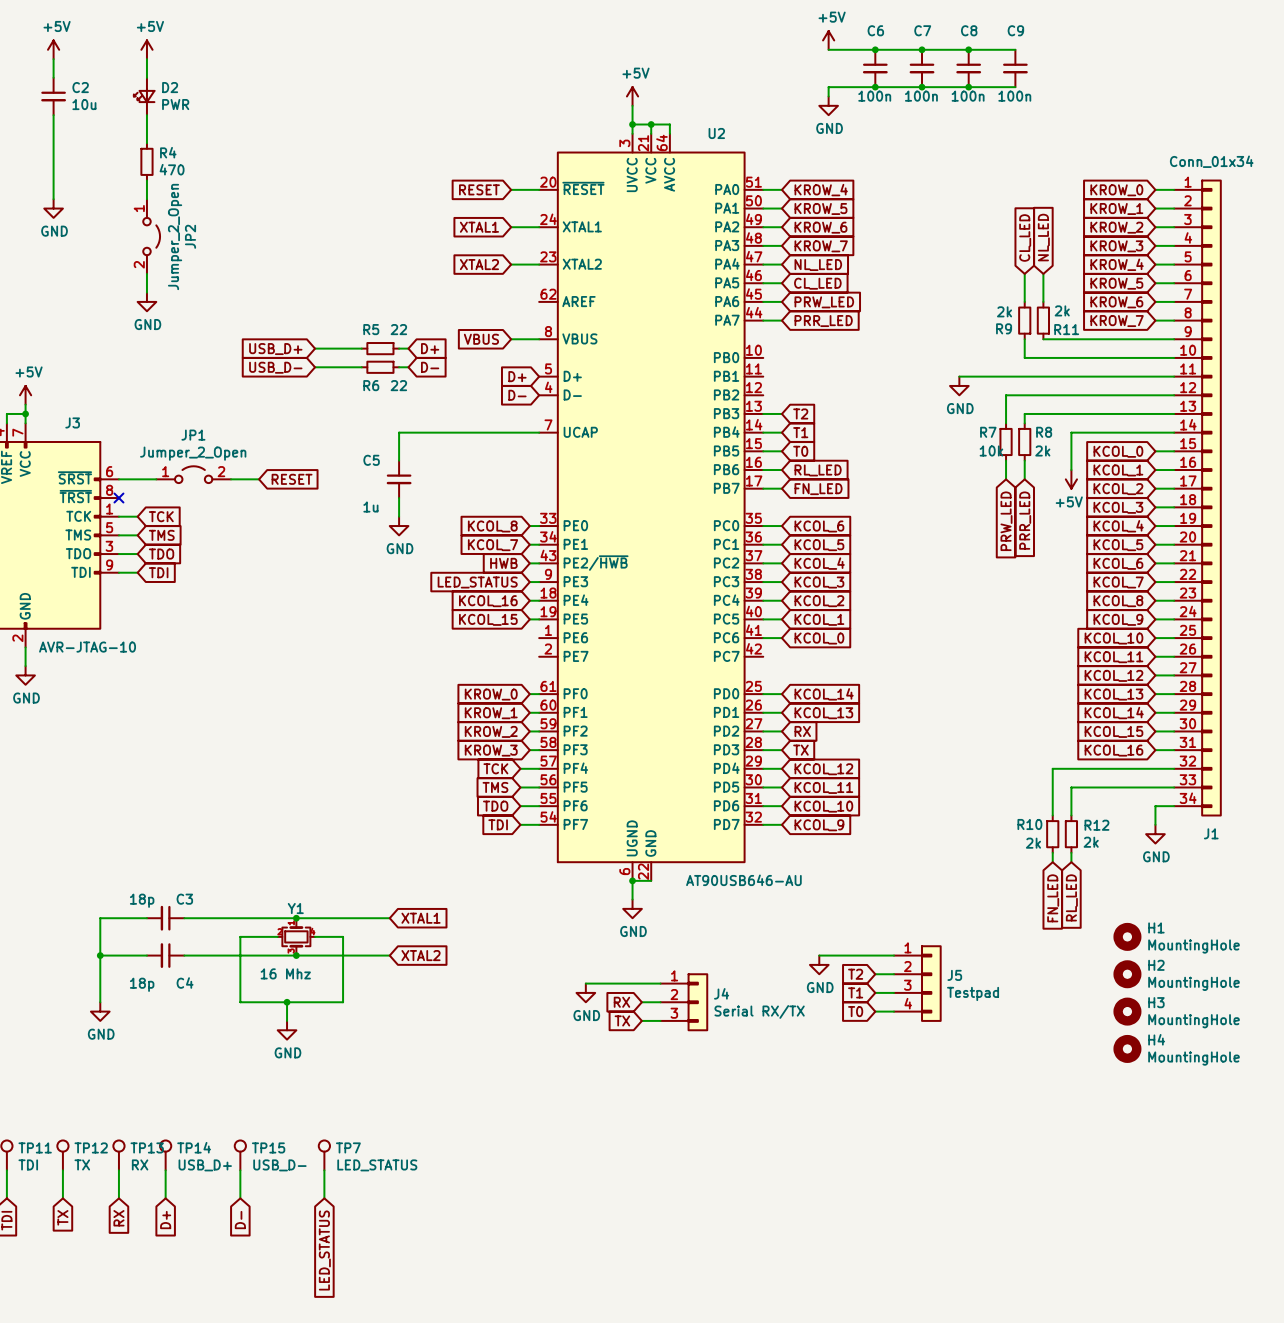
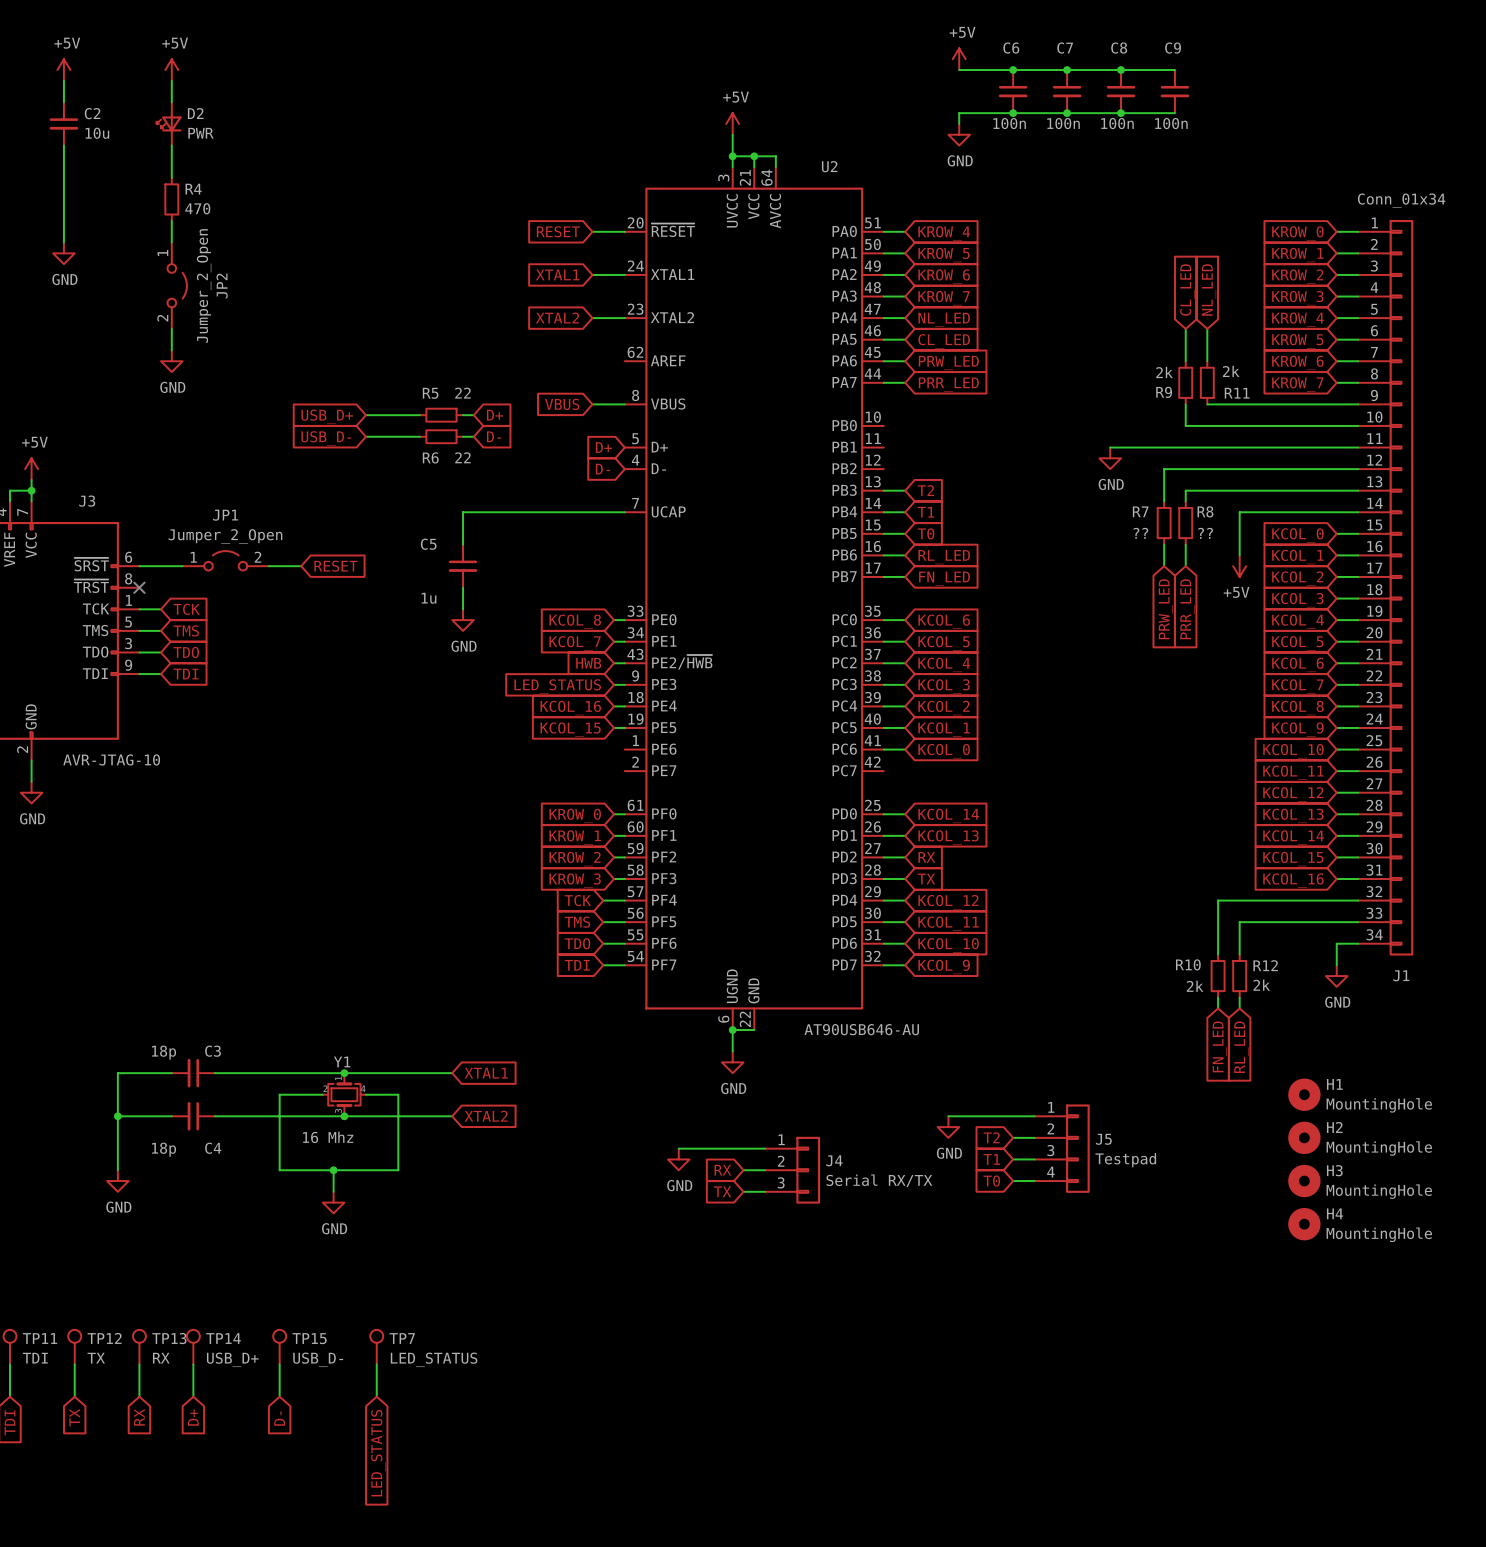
R7 value: 10k (991, 450) -> ?? (1140, 533)
R8 value: 2k (1042, 450) -> ?? (1205, 533)

